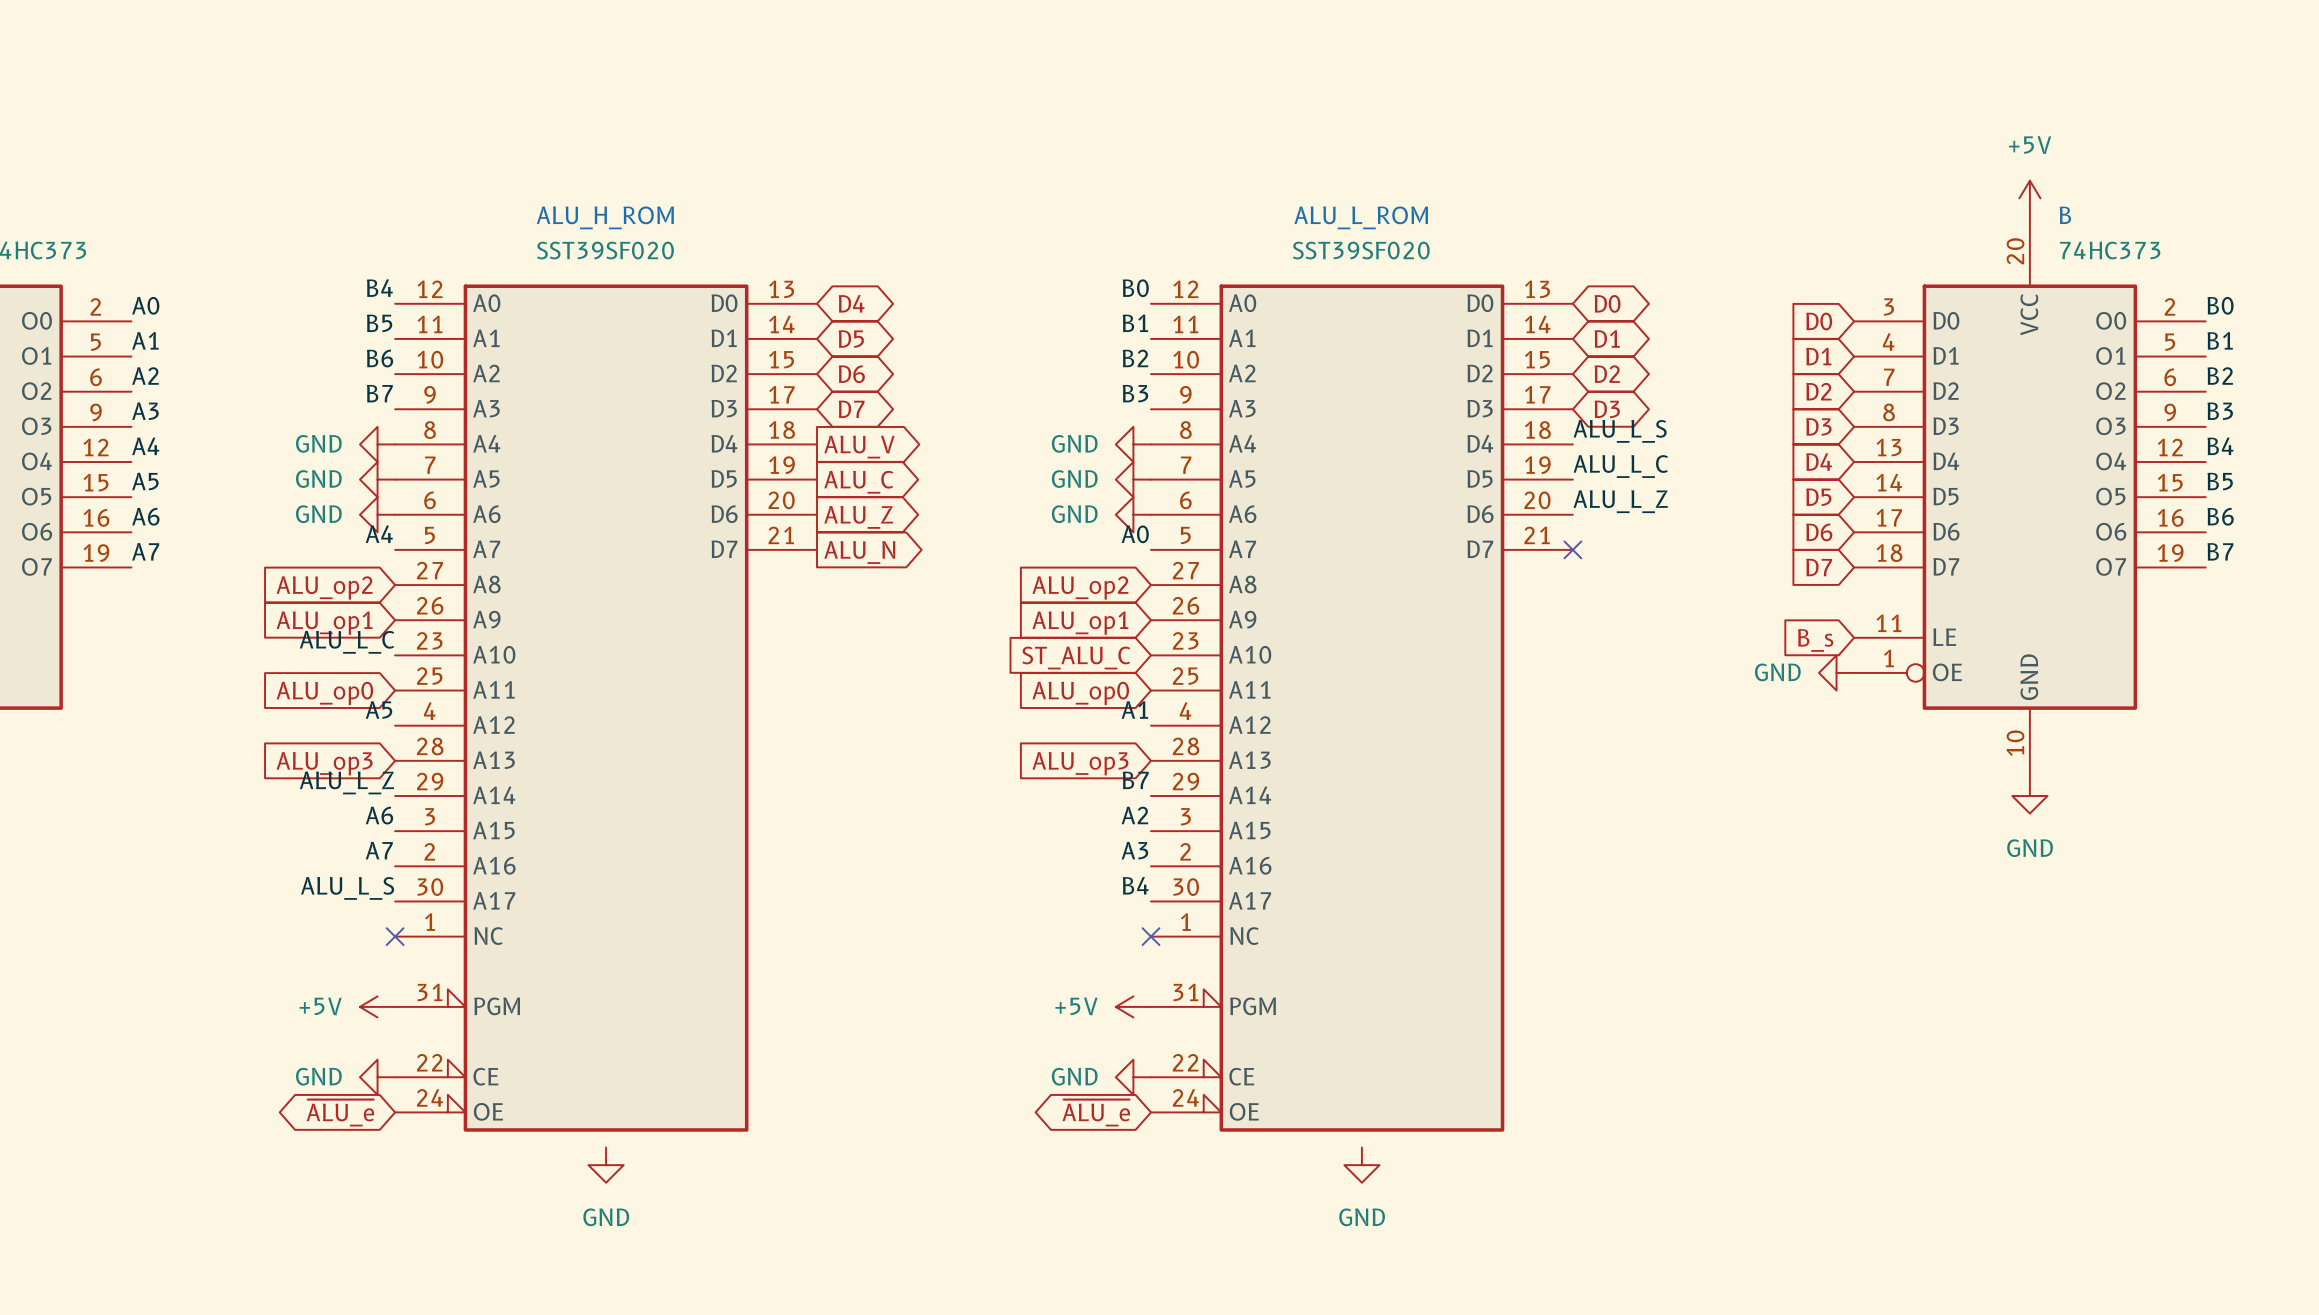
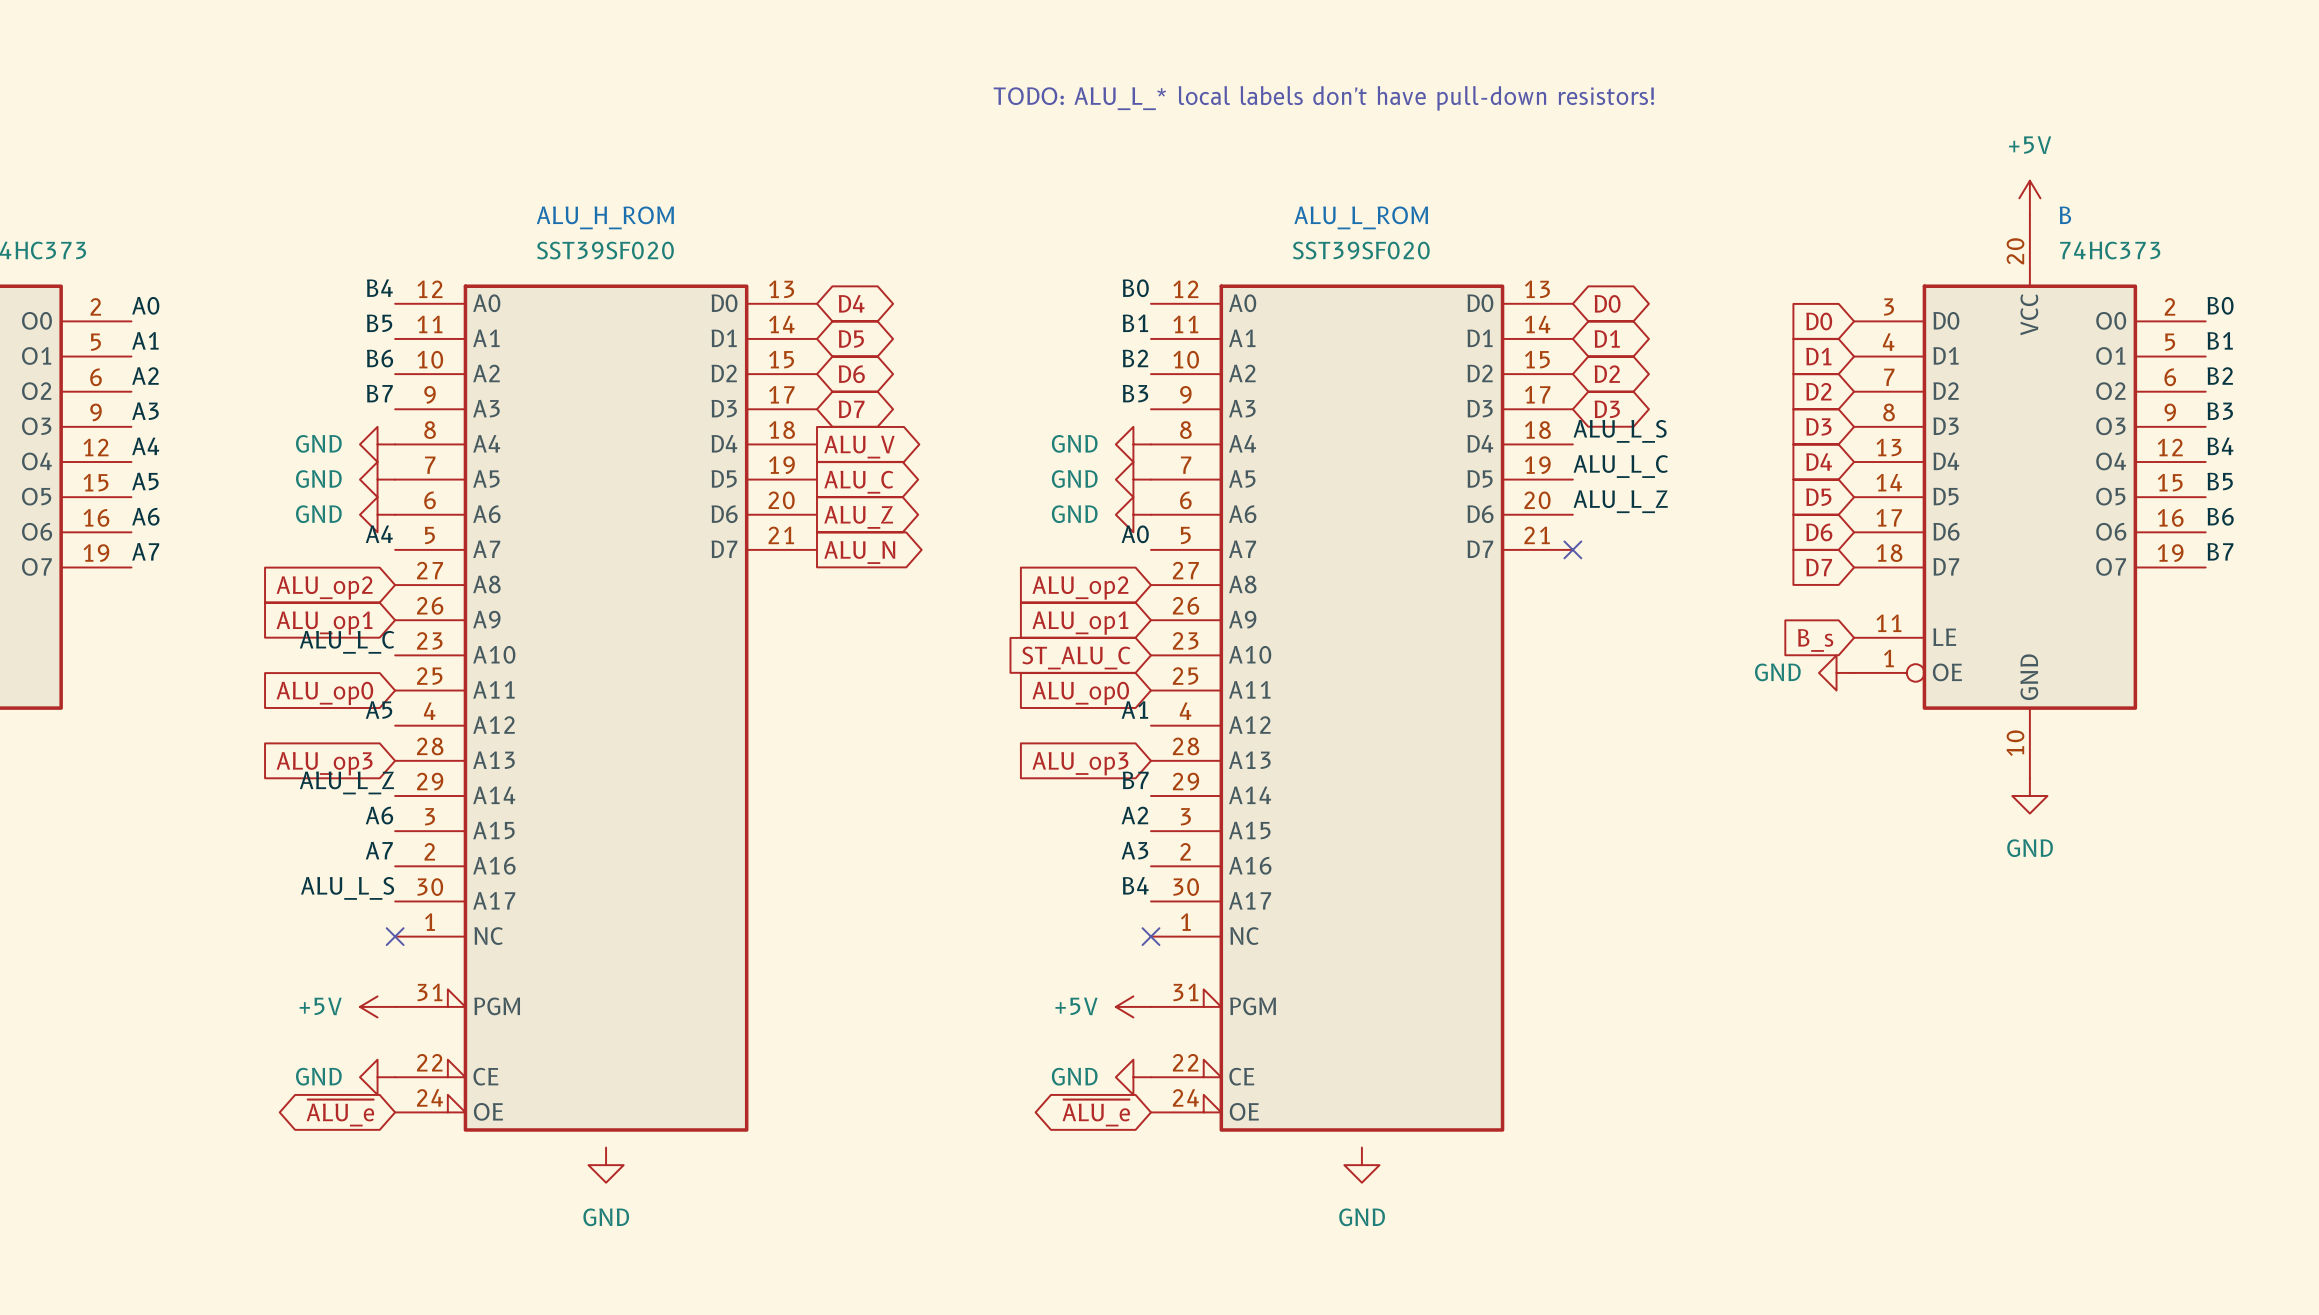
text: none -> TODO: ALU_L_* local labels don't have pull-down resistors! (1323, 98)

